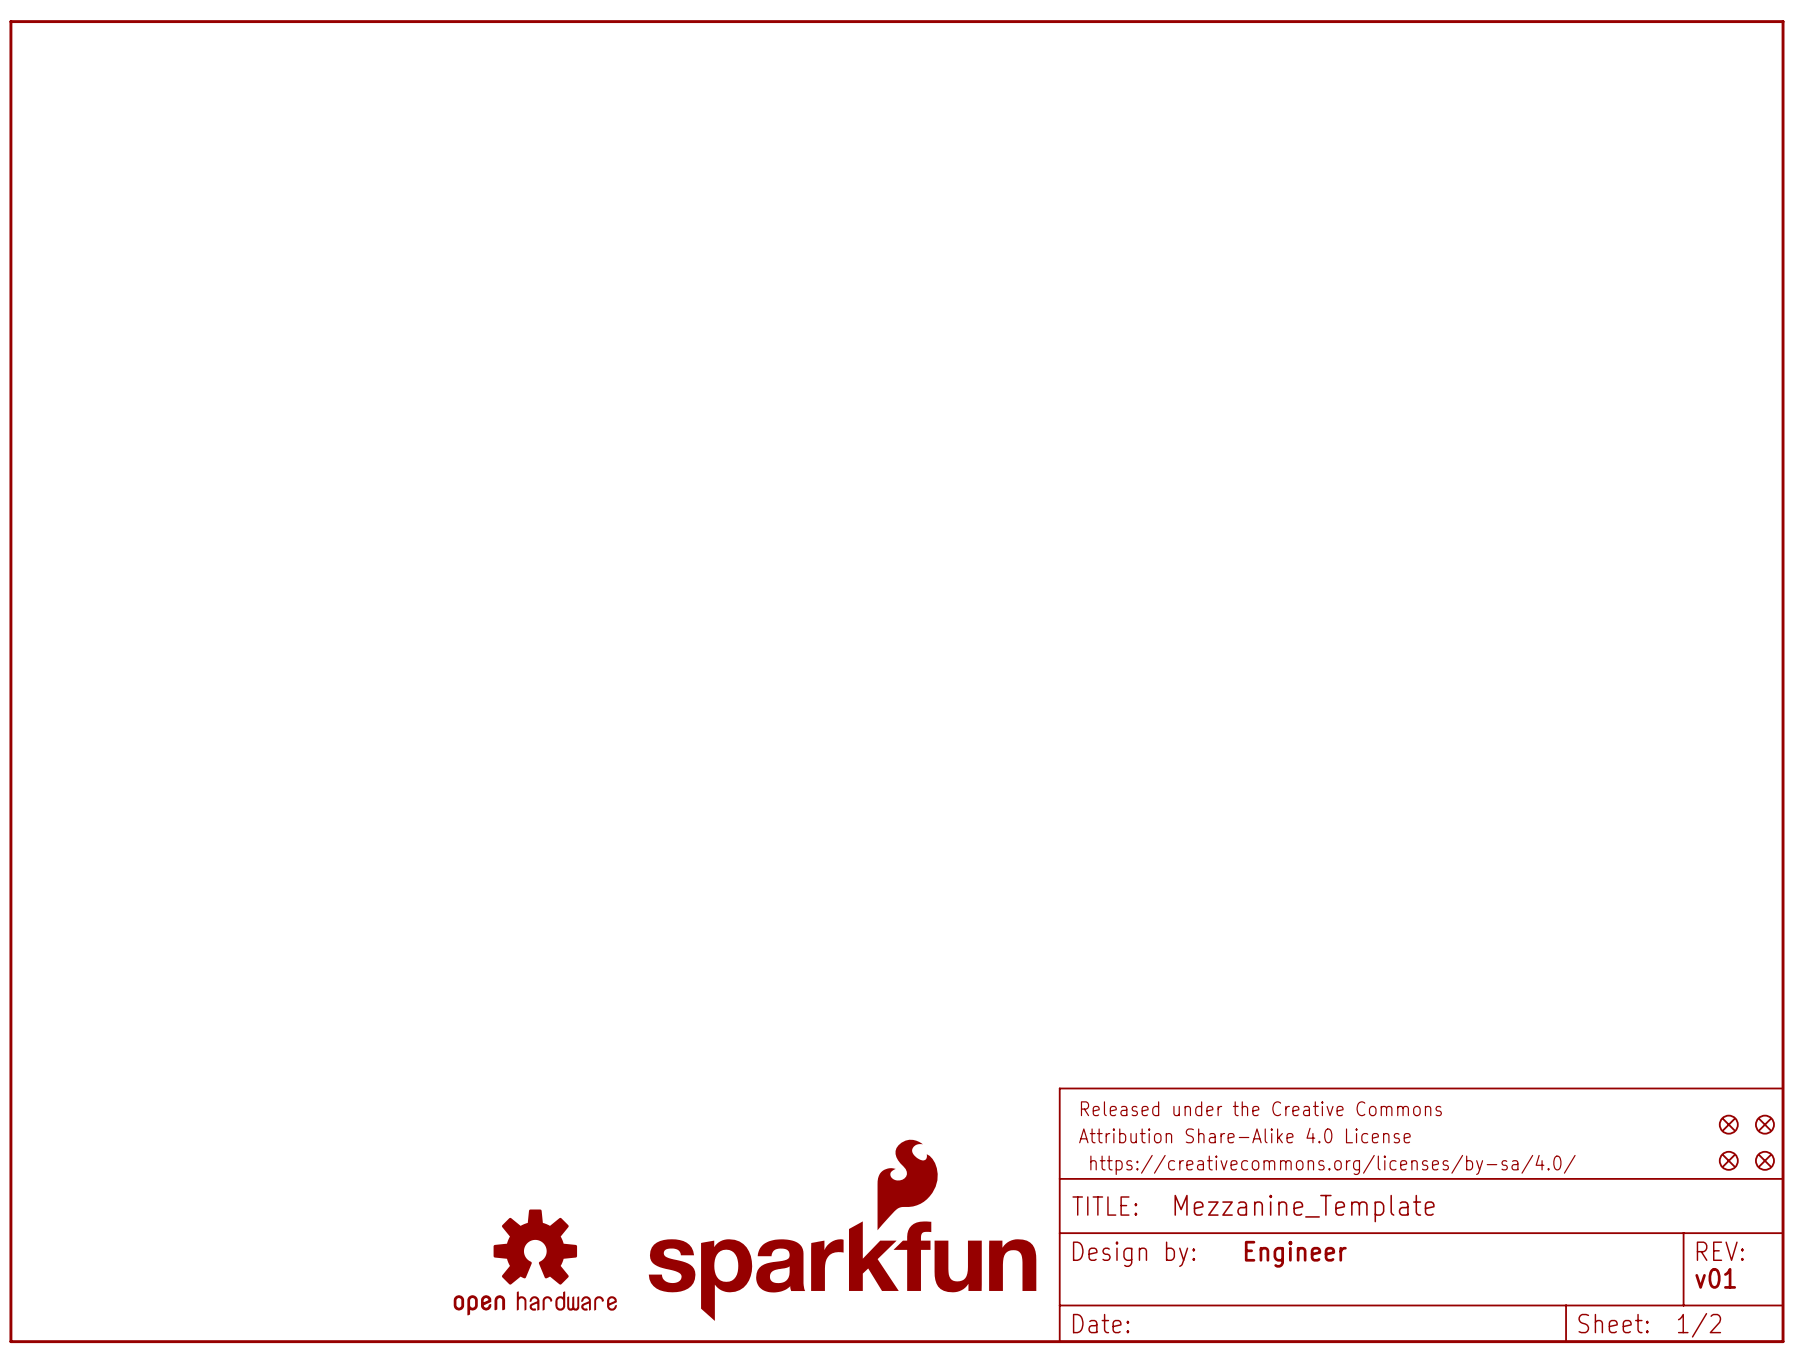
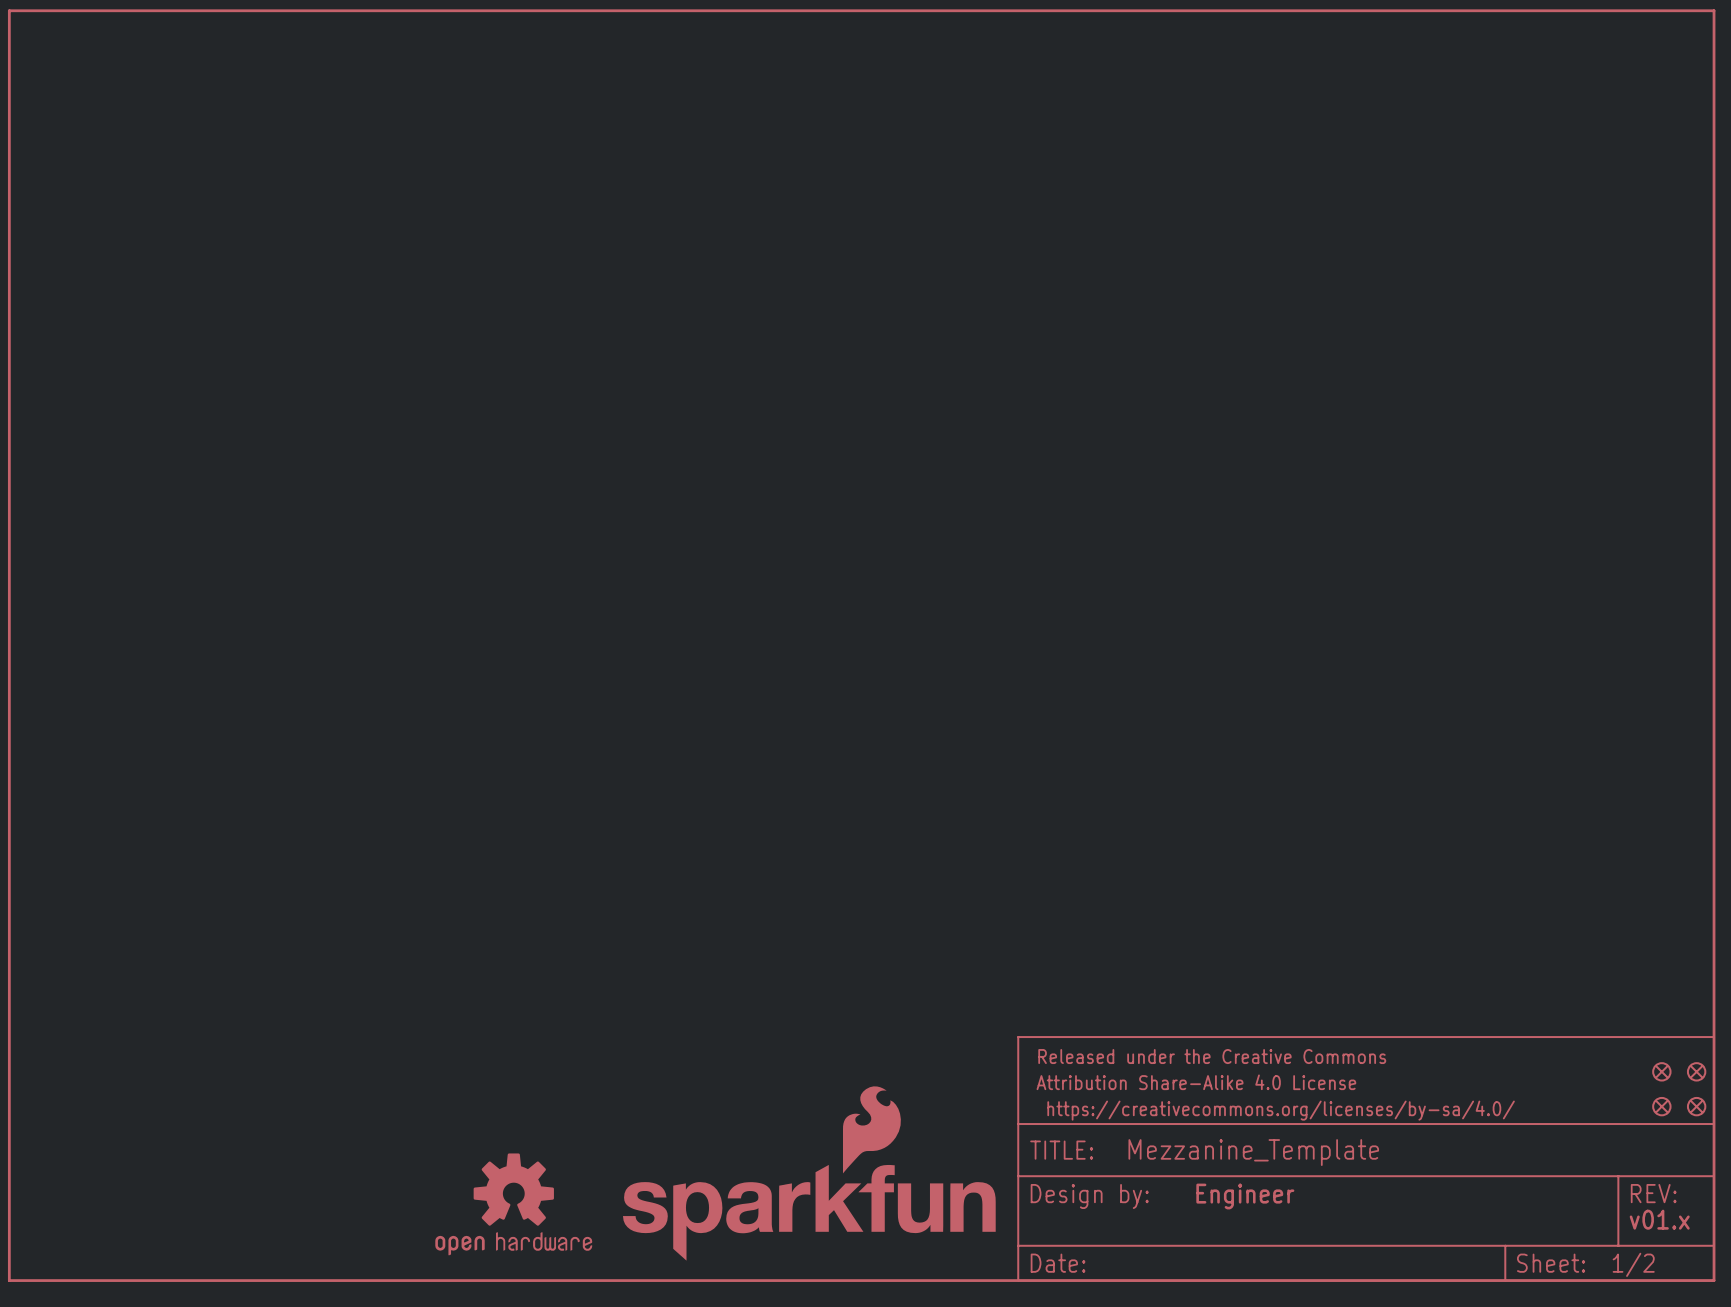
text: v01 (1715, 1278) -> v01.x (1659, 1219)

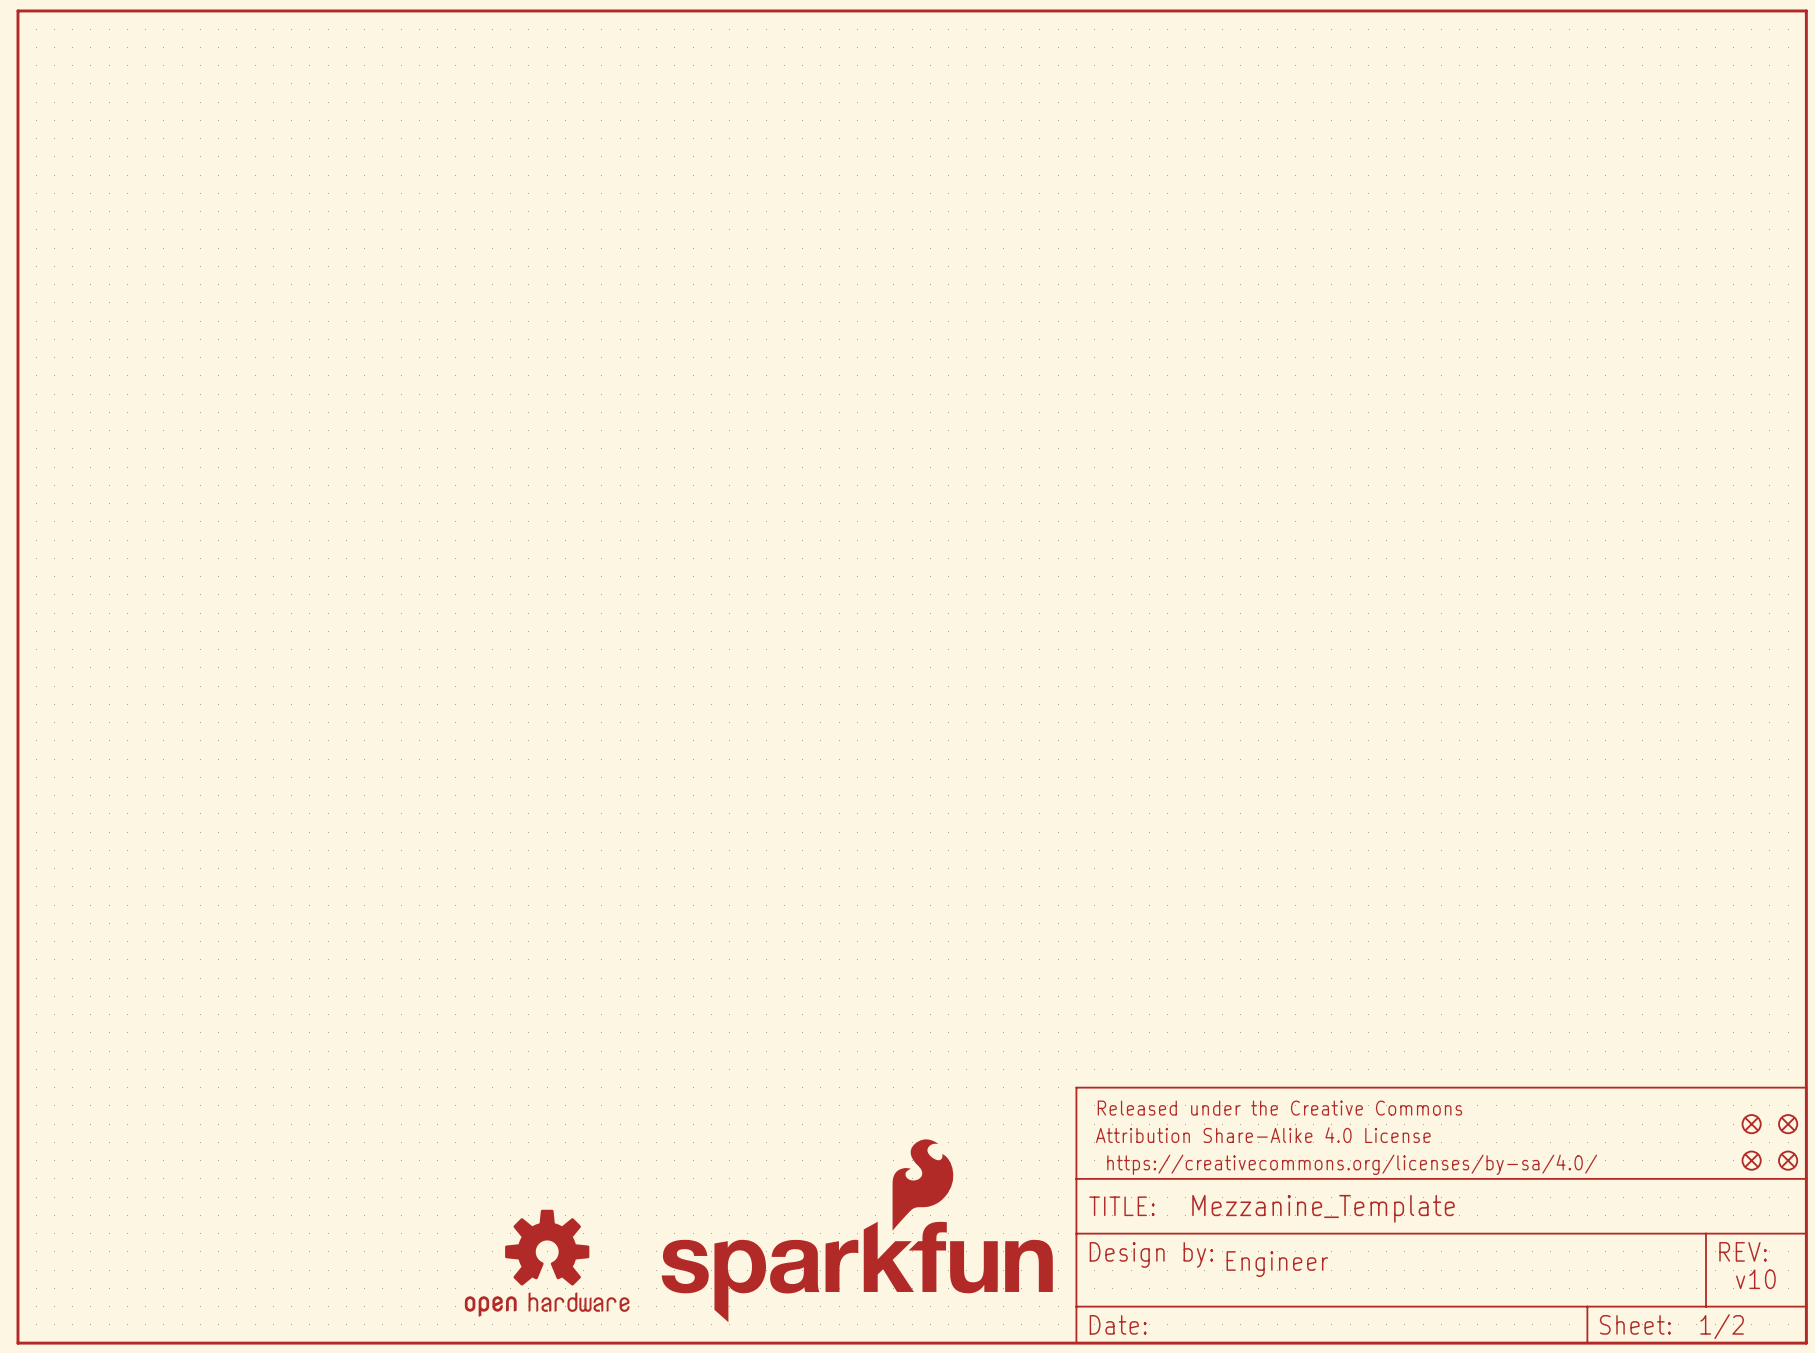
text position: Engineer (1245, 1196) -> Engineer (1277, 1264)
text: v01.x (1659, 1219) -> none
text: none -> v10 (1755, 1279)

